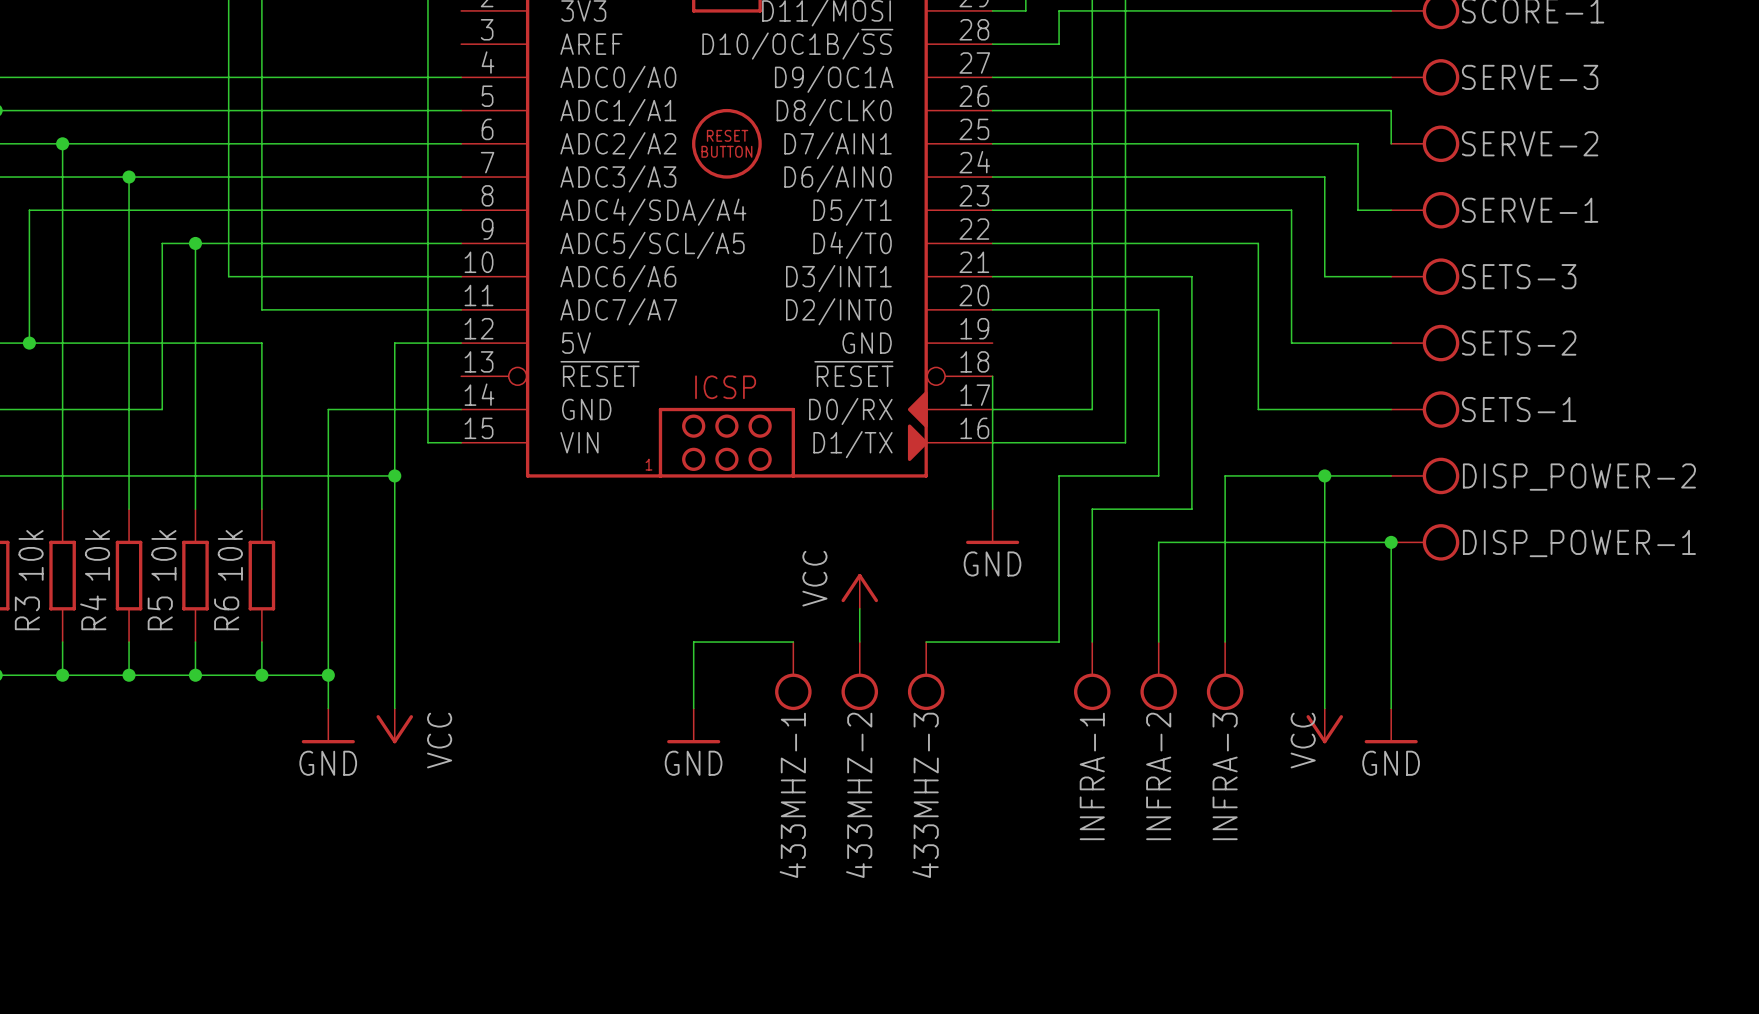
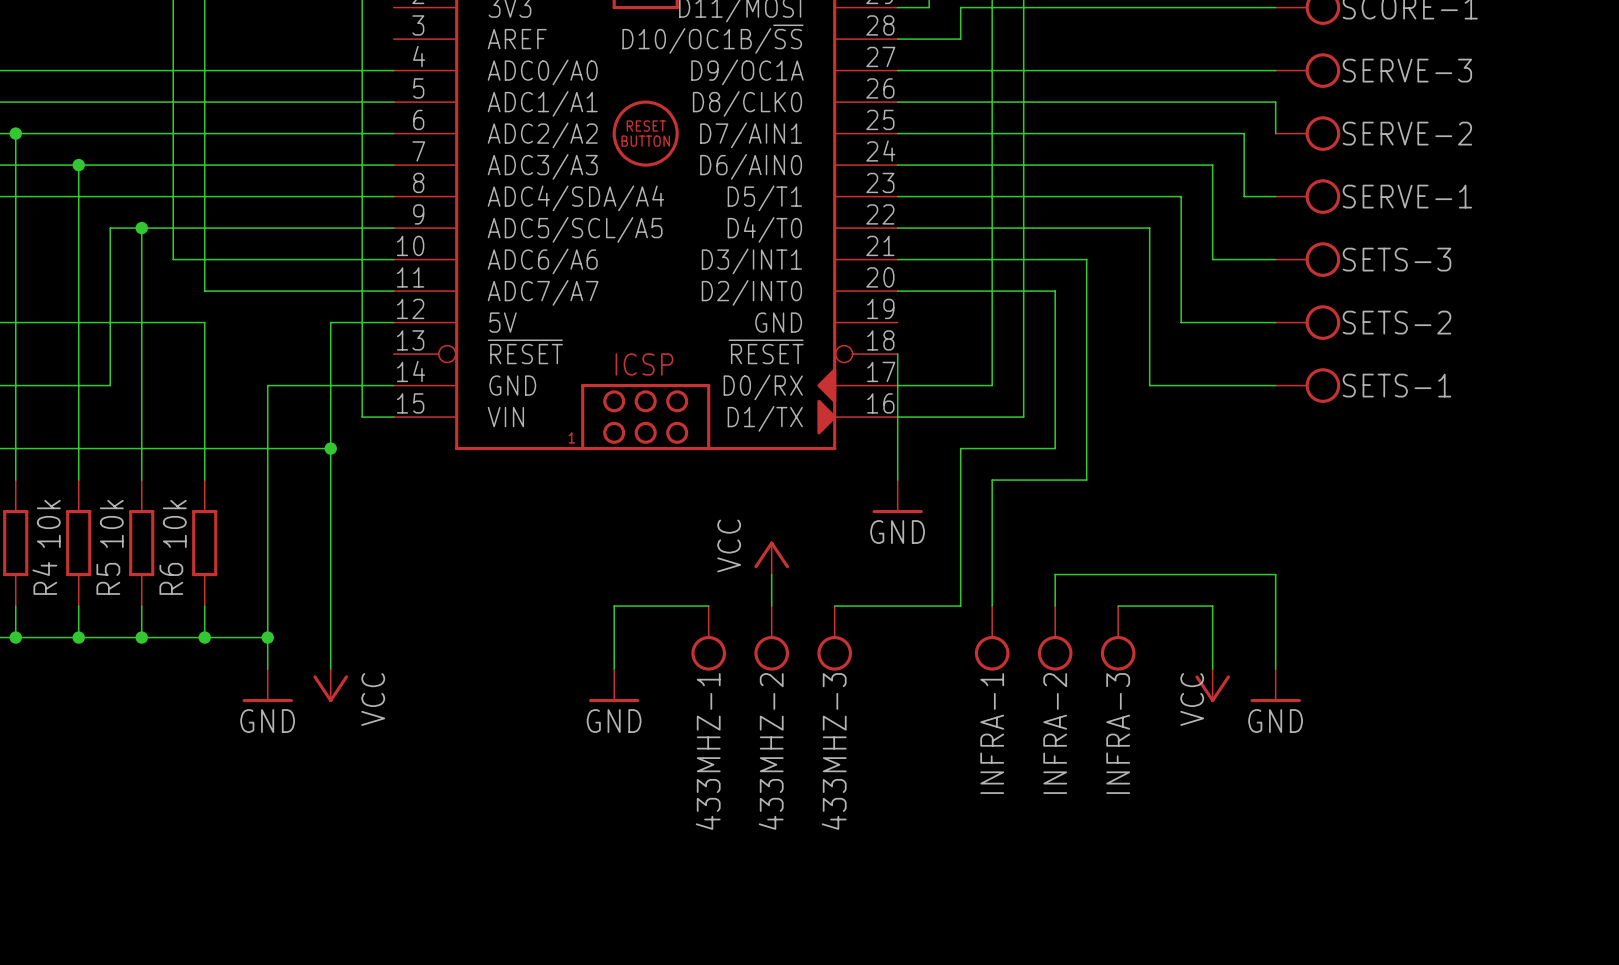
wire: (1324, 475) (1324, 642) -> none
junction: (1324, 475) -> none
wire: (1391, 475) (1225, 475) (1225, 642) -> (1212, 606) (1118, 606)
DISP_POWER-2: (1425, 475) -> none
junction: (1391, 542) -> none
DISP_POWER-1: (1425, 542) -> none
wire: (1158, 608) (1158, 542) (1391, 542) (1391, 608) -> (1055, 574) (1275, 574)

